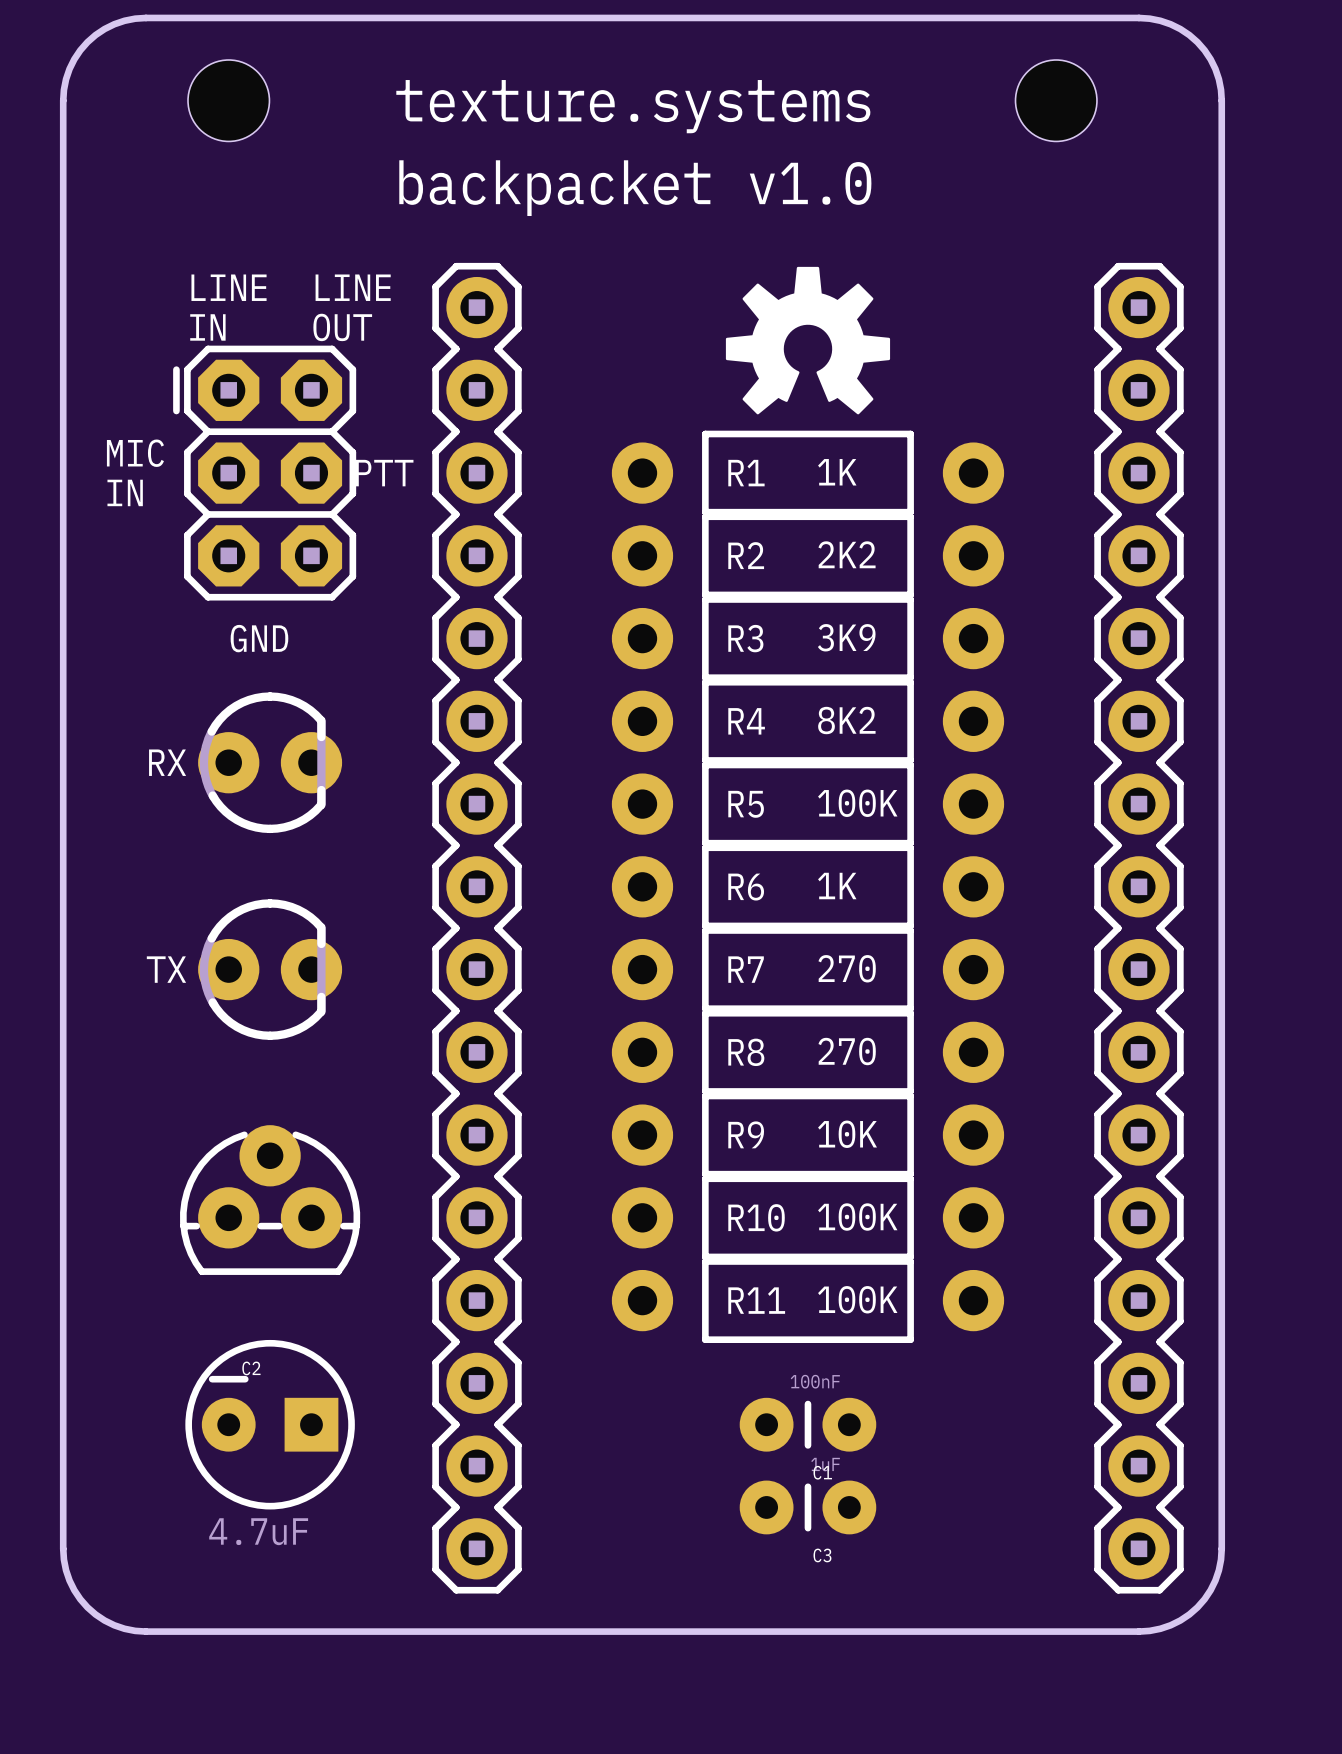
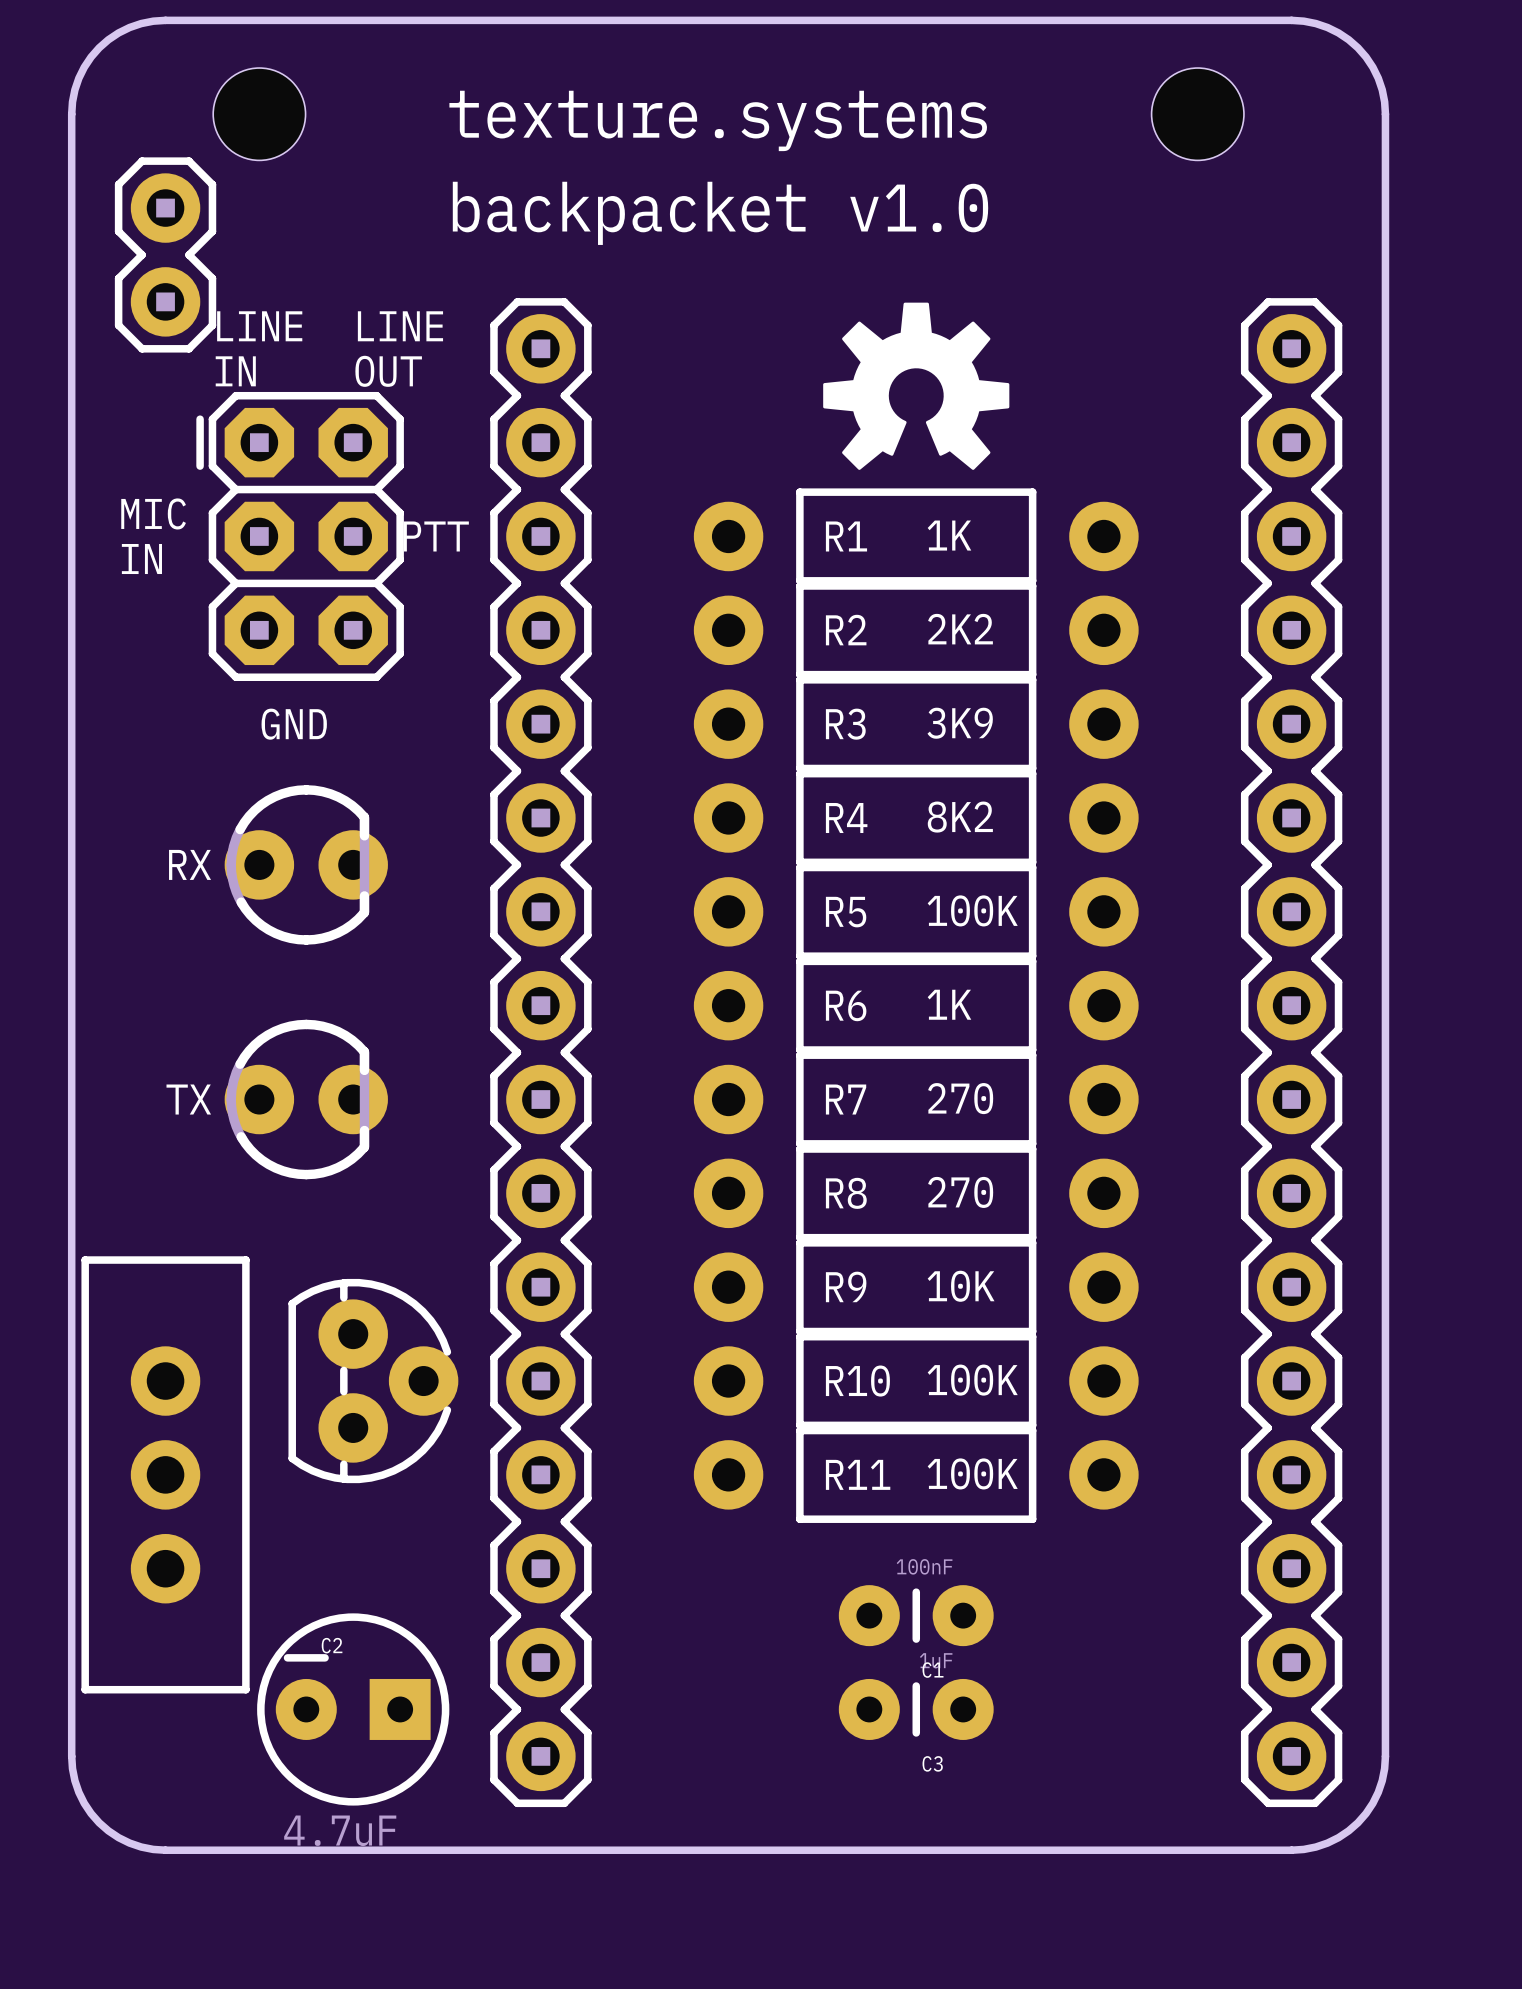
part: none -> (165, 254)
part rotation: 0° (270, 1200) -> 90° clockwise (373, 1381)
part: none -> (165, 1474)
C2 position: (270, 1424) -> (353, 1709)

